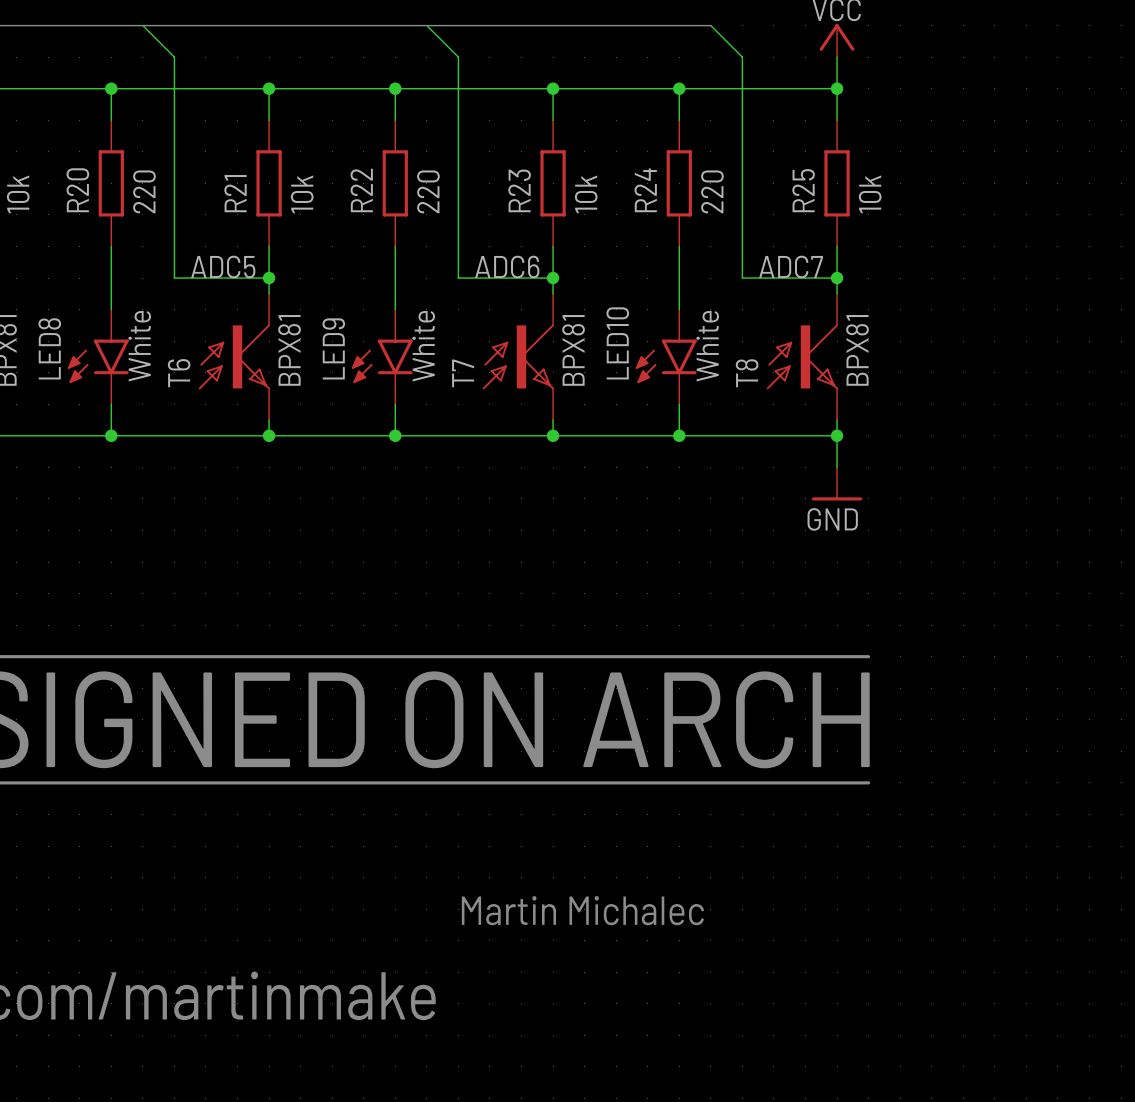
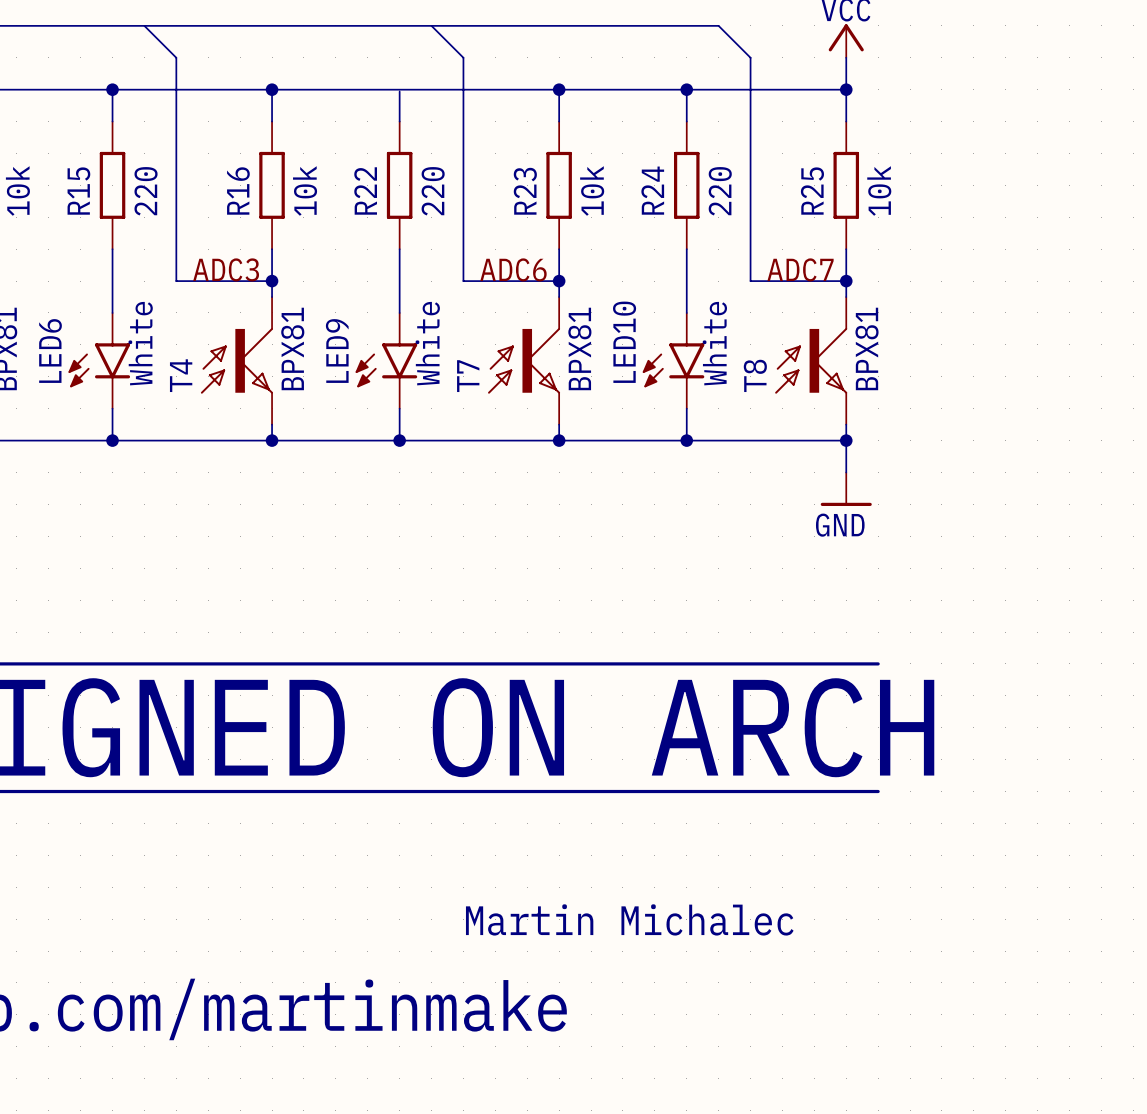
junction: (395, 88) -> none
R20 name: R20 (77, 190) -> R15 (78, 191)
R21 name: R21 (235, 193) -> R16 (238, 191)
label: ADC5 (223, 267) -> ADC3 (226, 269)
LED8 name: LED8 (49, 348) -> LED6 (50, 351)
T6 name: T6 (179, 373) -> T4 (181, 375)

